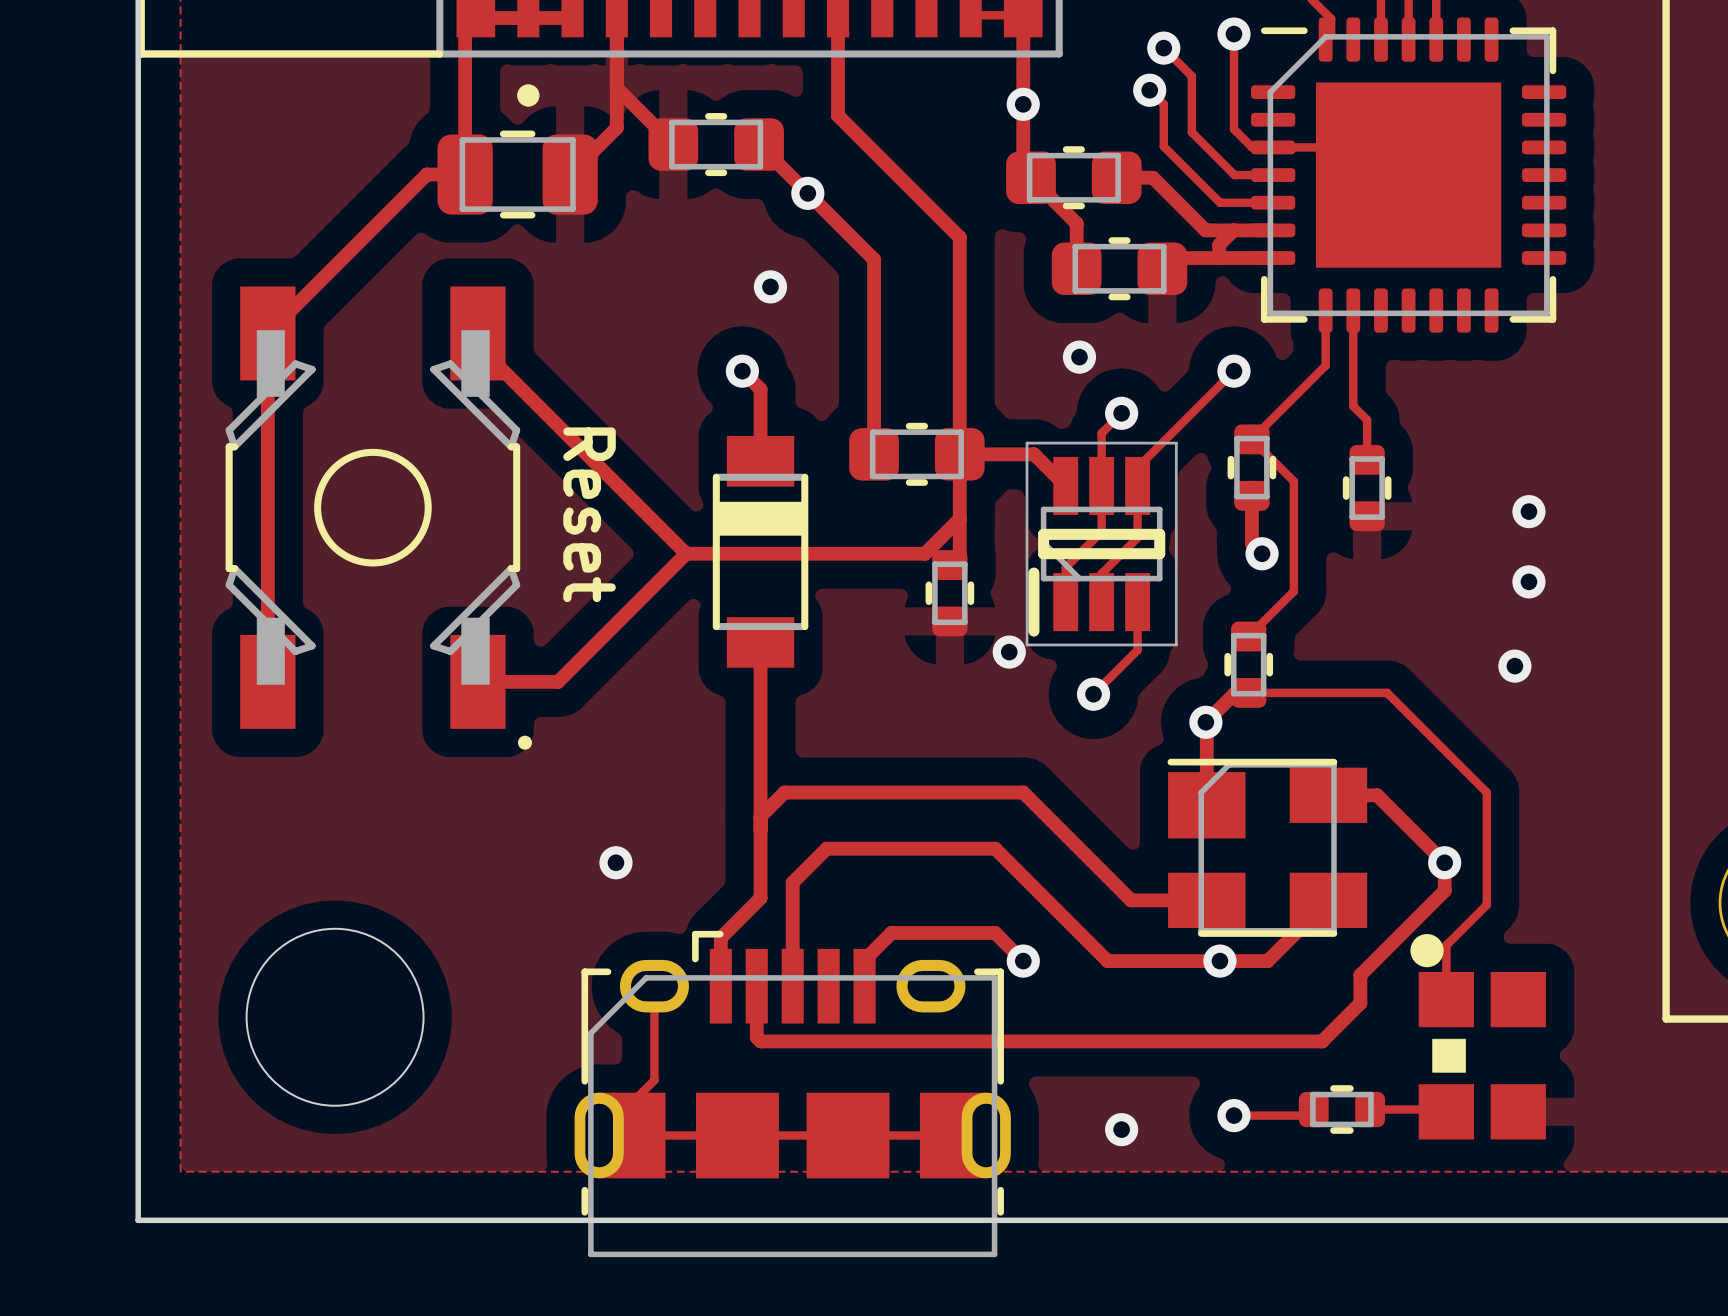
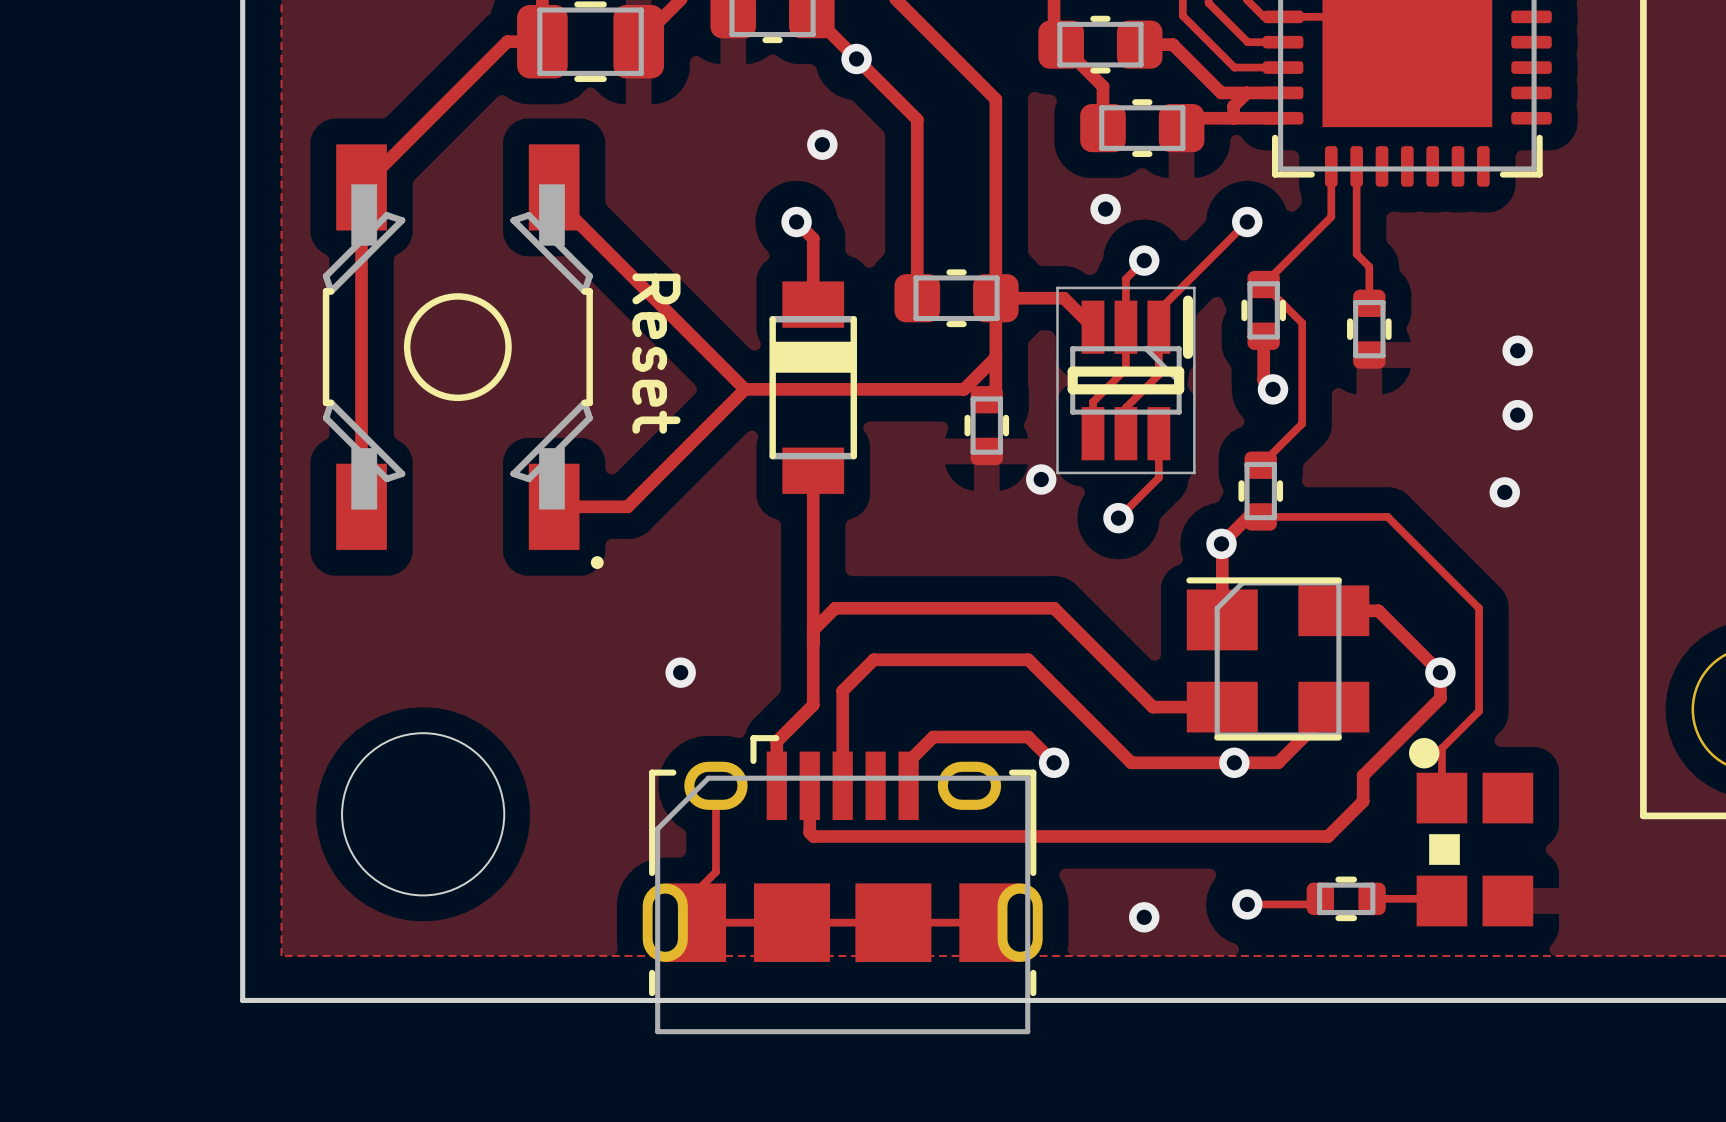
part rotation: 0° (1101, 544) -> 180° (1125, 380)

